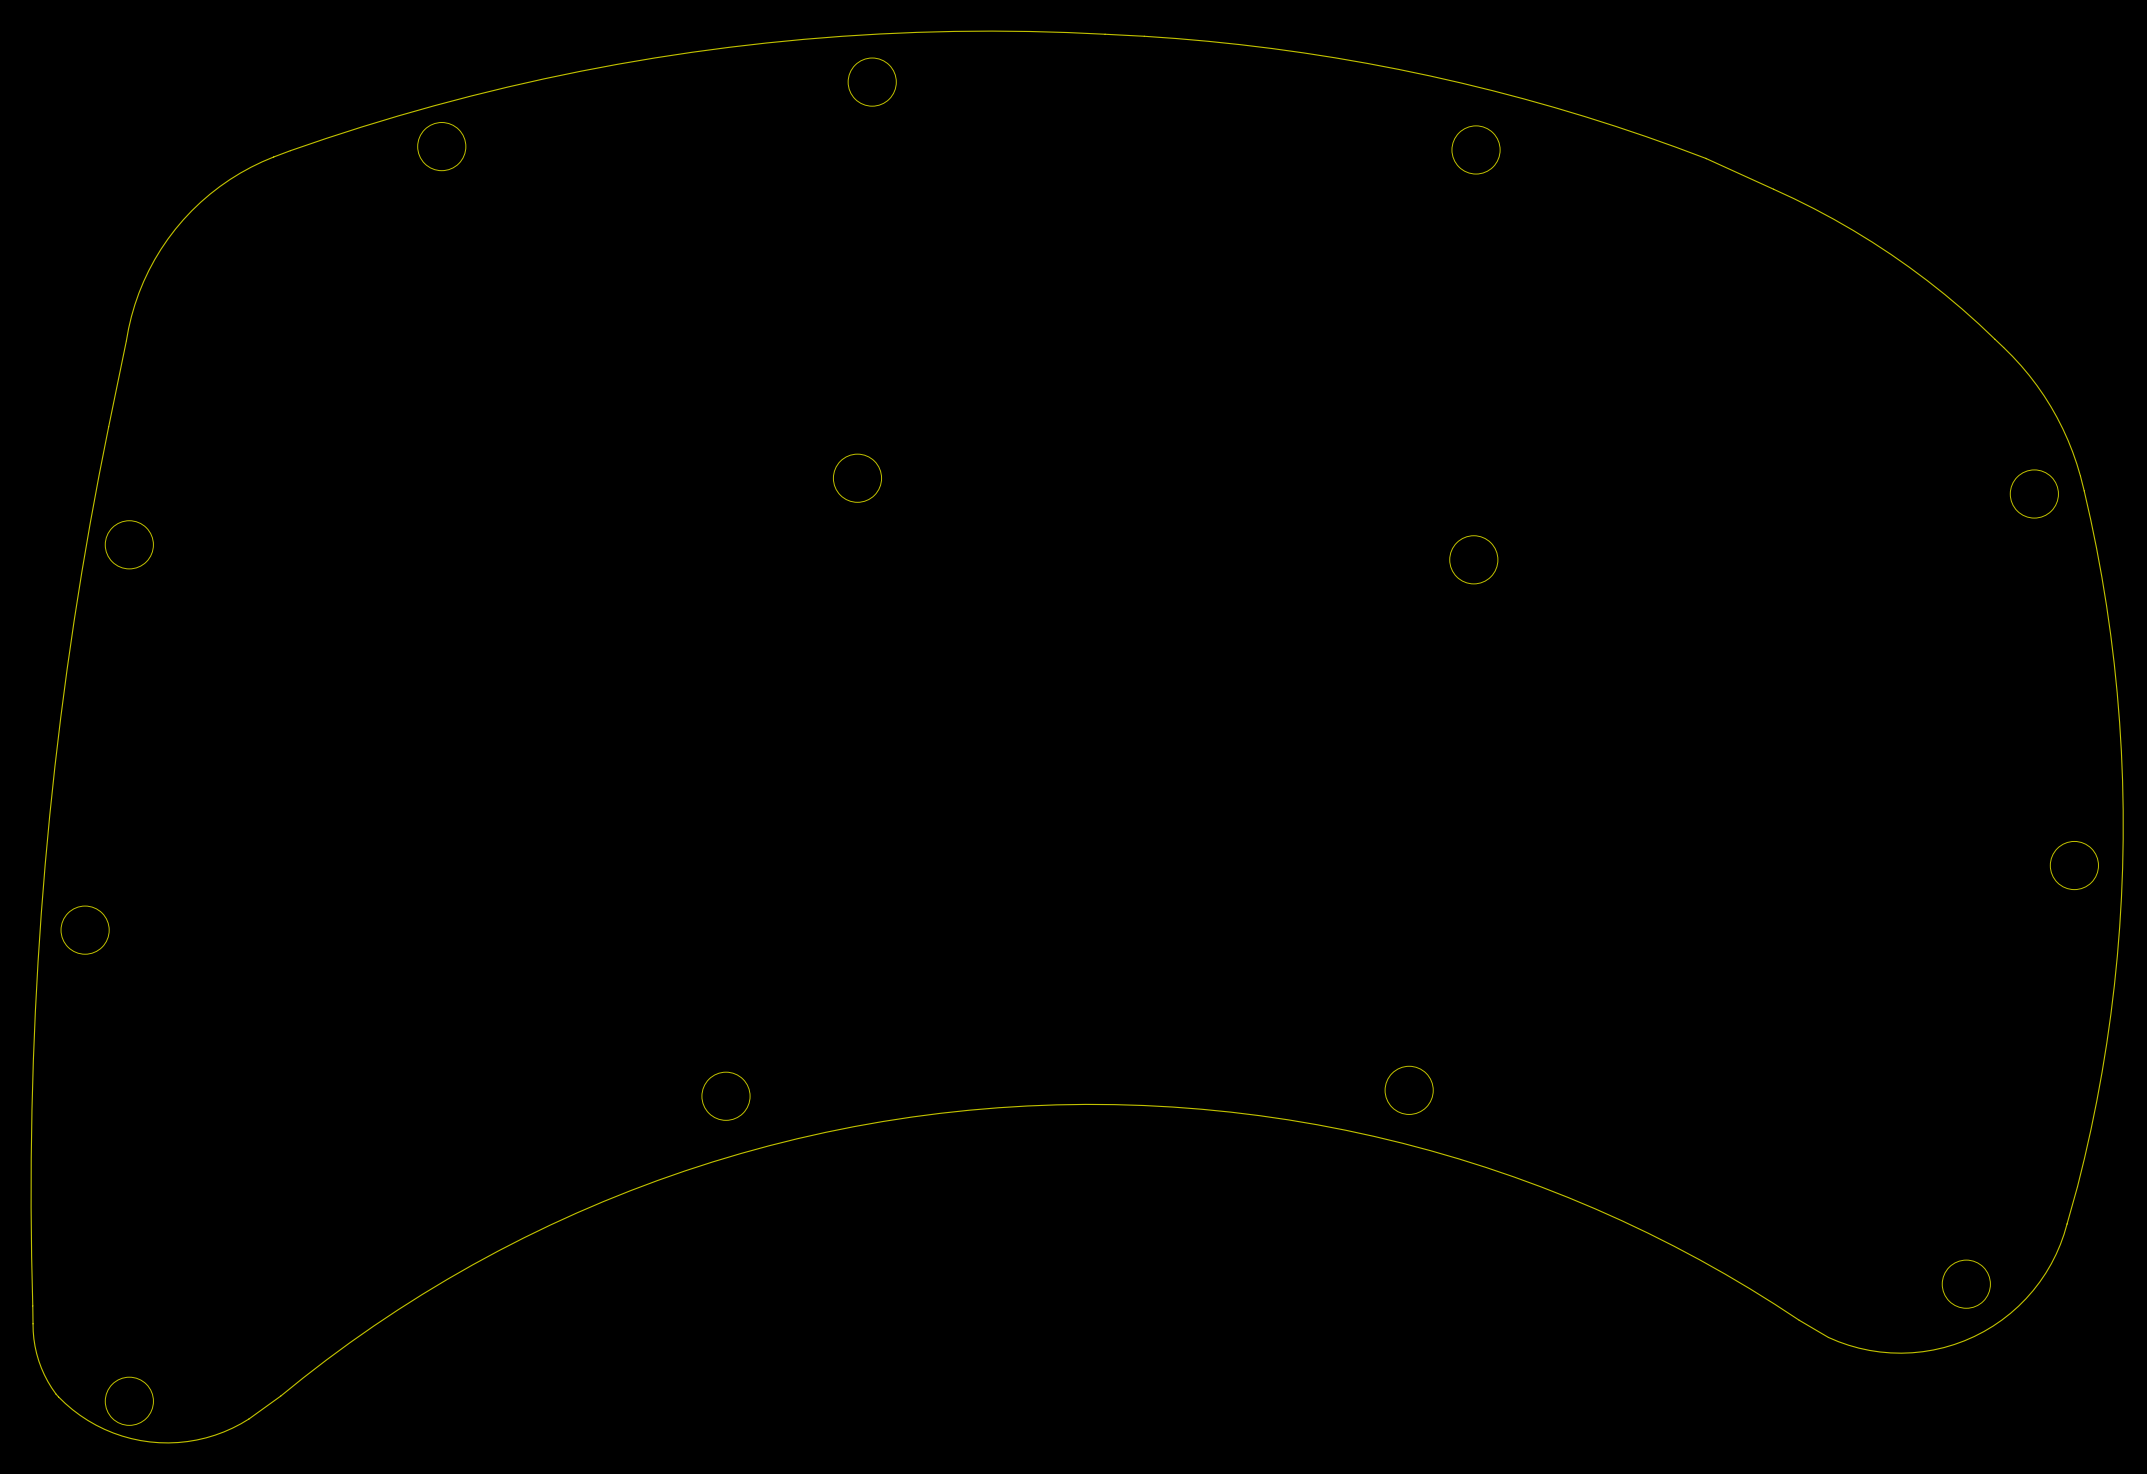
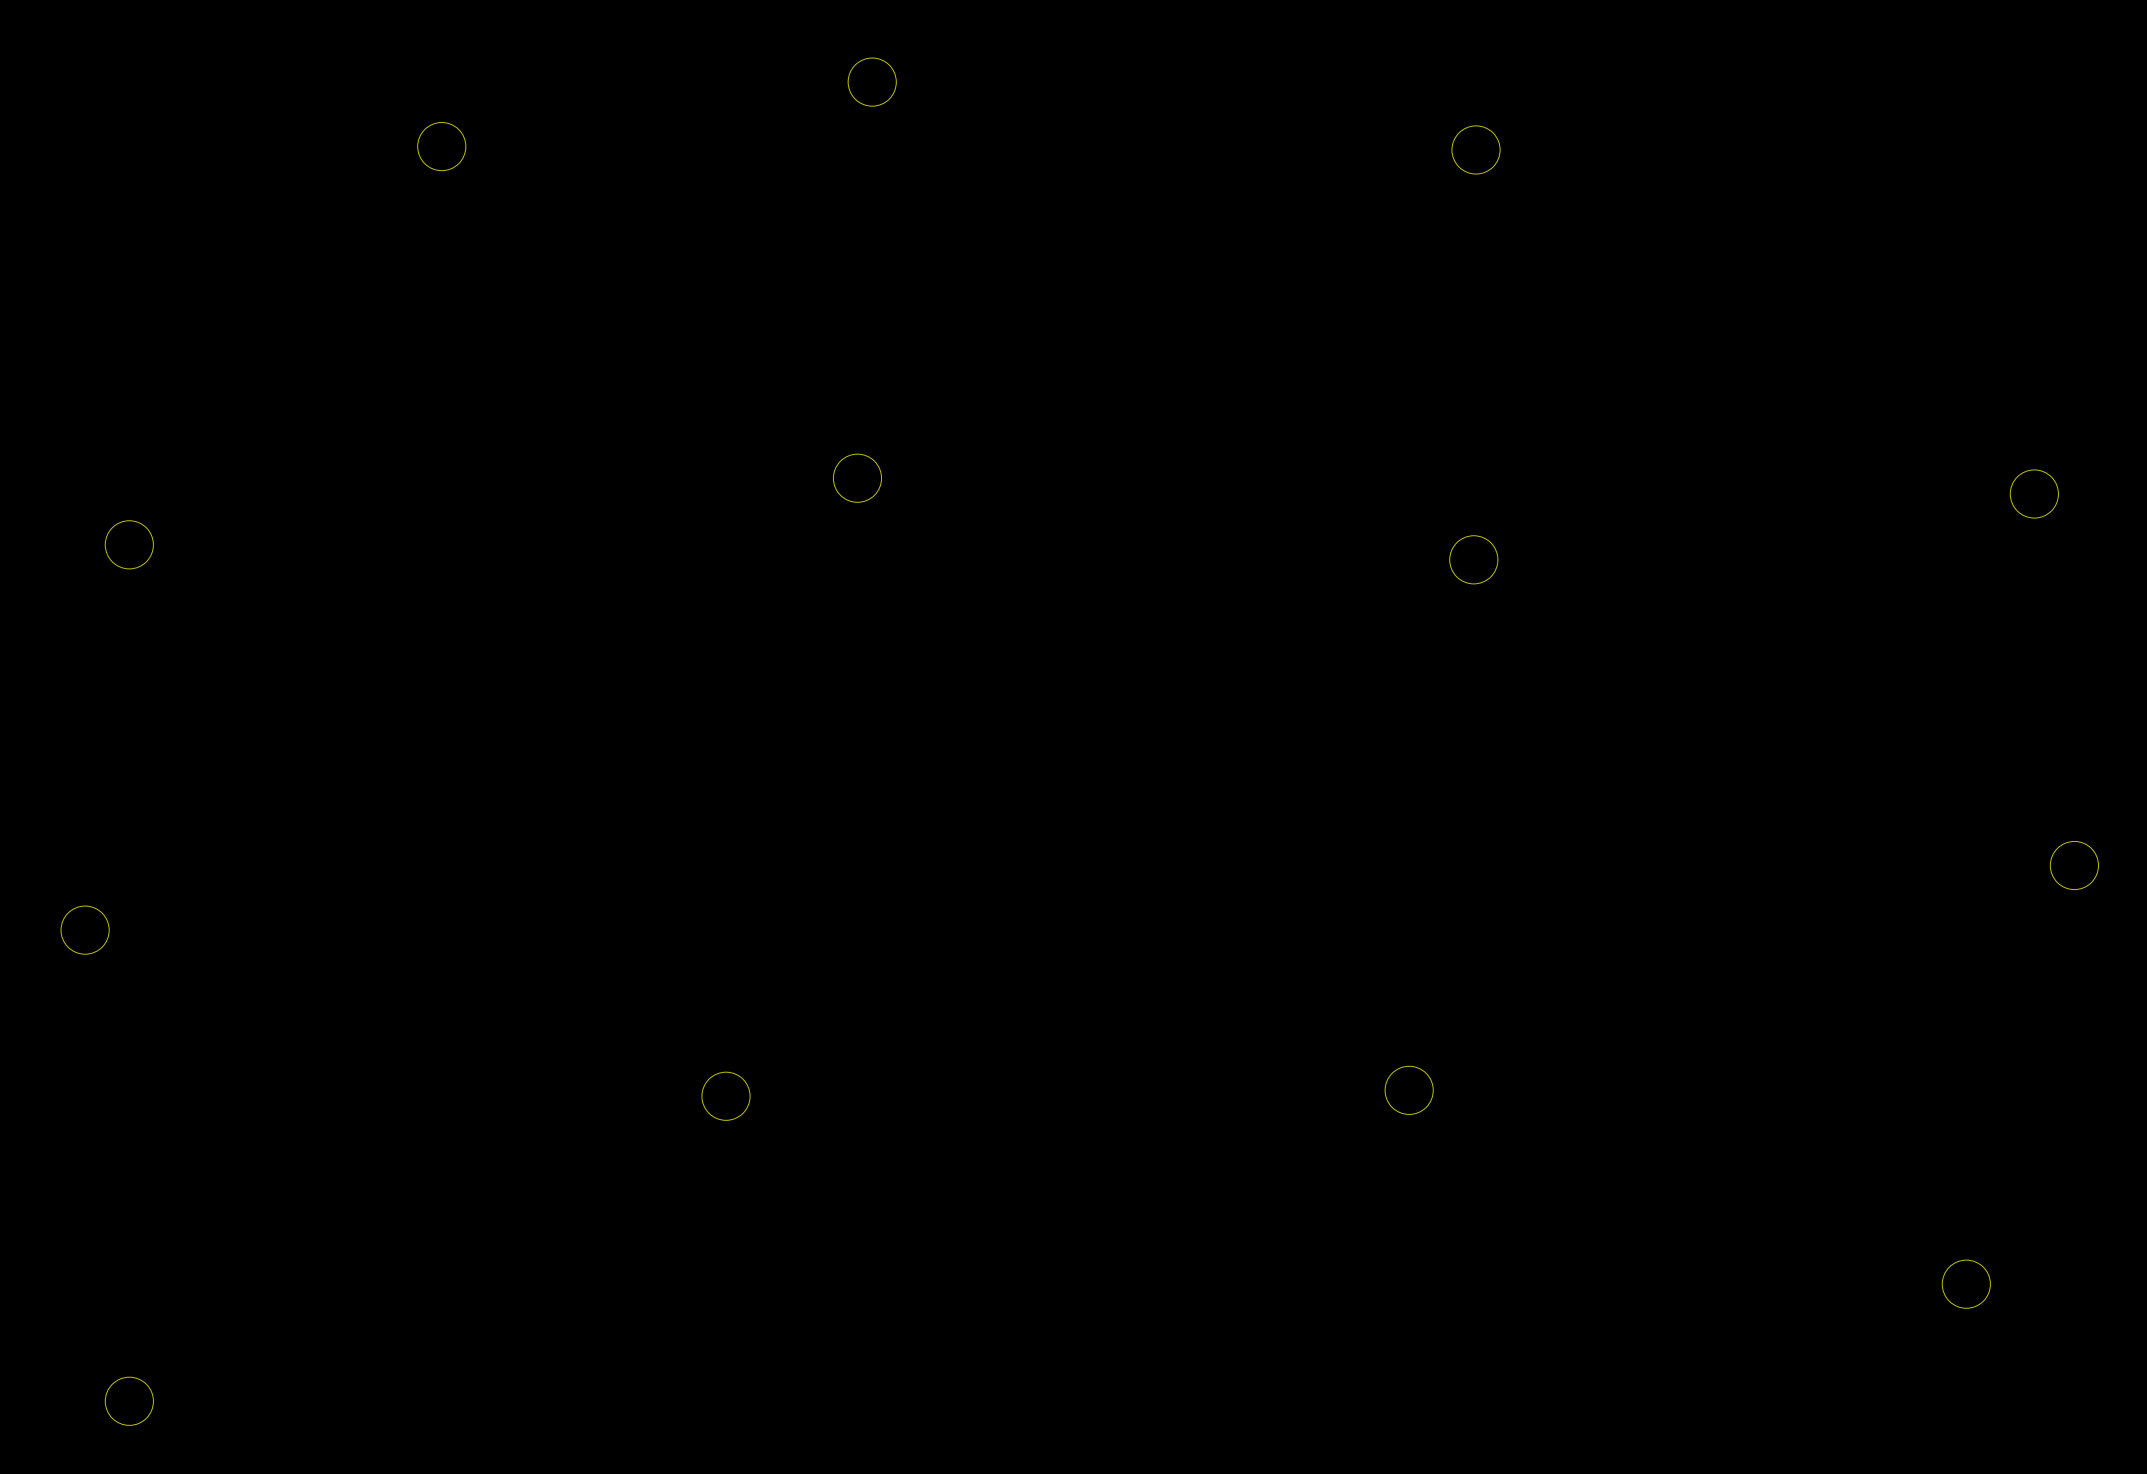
board edge: (1705, 158) (1773, 189) (1793, 198) (1853, 230) (1909, 267) (1962, 309) (2012, 356) (2036, 385) (2062, 428) (2080, 476) (2096, 548) (2106, 605) (2119, 722) (2123, 839) (2117, 956) (2106, 1043) (2096, 1100) (2084, 1158) (2064, 1234) (2056, 1254) (2039, 1282) (2018, 1306) (2001, 1320) (1974, 1336) (1933, 1349) (1890, 1352) (1858, 1348) (1828, 1337) (1725, 1274) (1621, 1220) (1541, 1186) (1458, 1158) (1374, 1136) (1259, 1115) (1143, 1105) (1056, 1104) (940, 1113) (825, 1132) (740, 1153) (630, 1190) (550, 1225) (447, 1279) (349, 1342) (249, 1418) (232, 1428) (206, 1437) (178, 1442) (159, 1442) (122, 1436) (87, 1420) (56, 1394) (41, 1367) (33, 1338) (31, 1158) (33, 1060) (41, 913) (49, 815) (67, 668) (99, 475) (134, 304) (148, 270) (168, 238) (191, 210) (219, 186) (262, 161) (326, 138) (434, 105) (543, 78) (654, 57) (766, 42) (879, 34) (954, 31) (1029, 31) (1144, 36) (1240, 44) (1335, 57) (1430, 75) (1523, 98) (1615, 126) (1676, 147) (1706, 158) -> none

